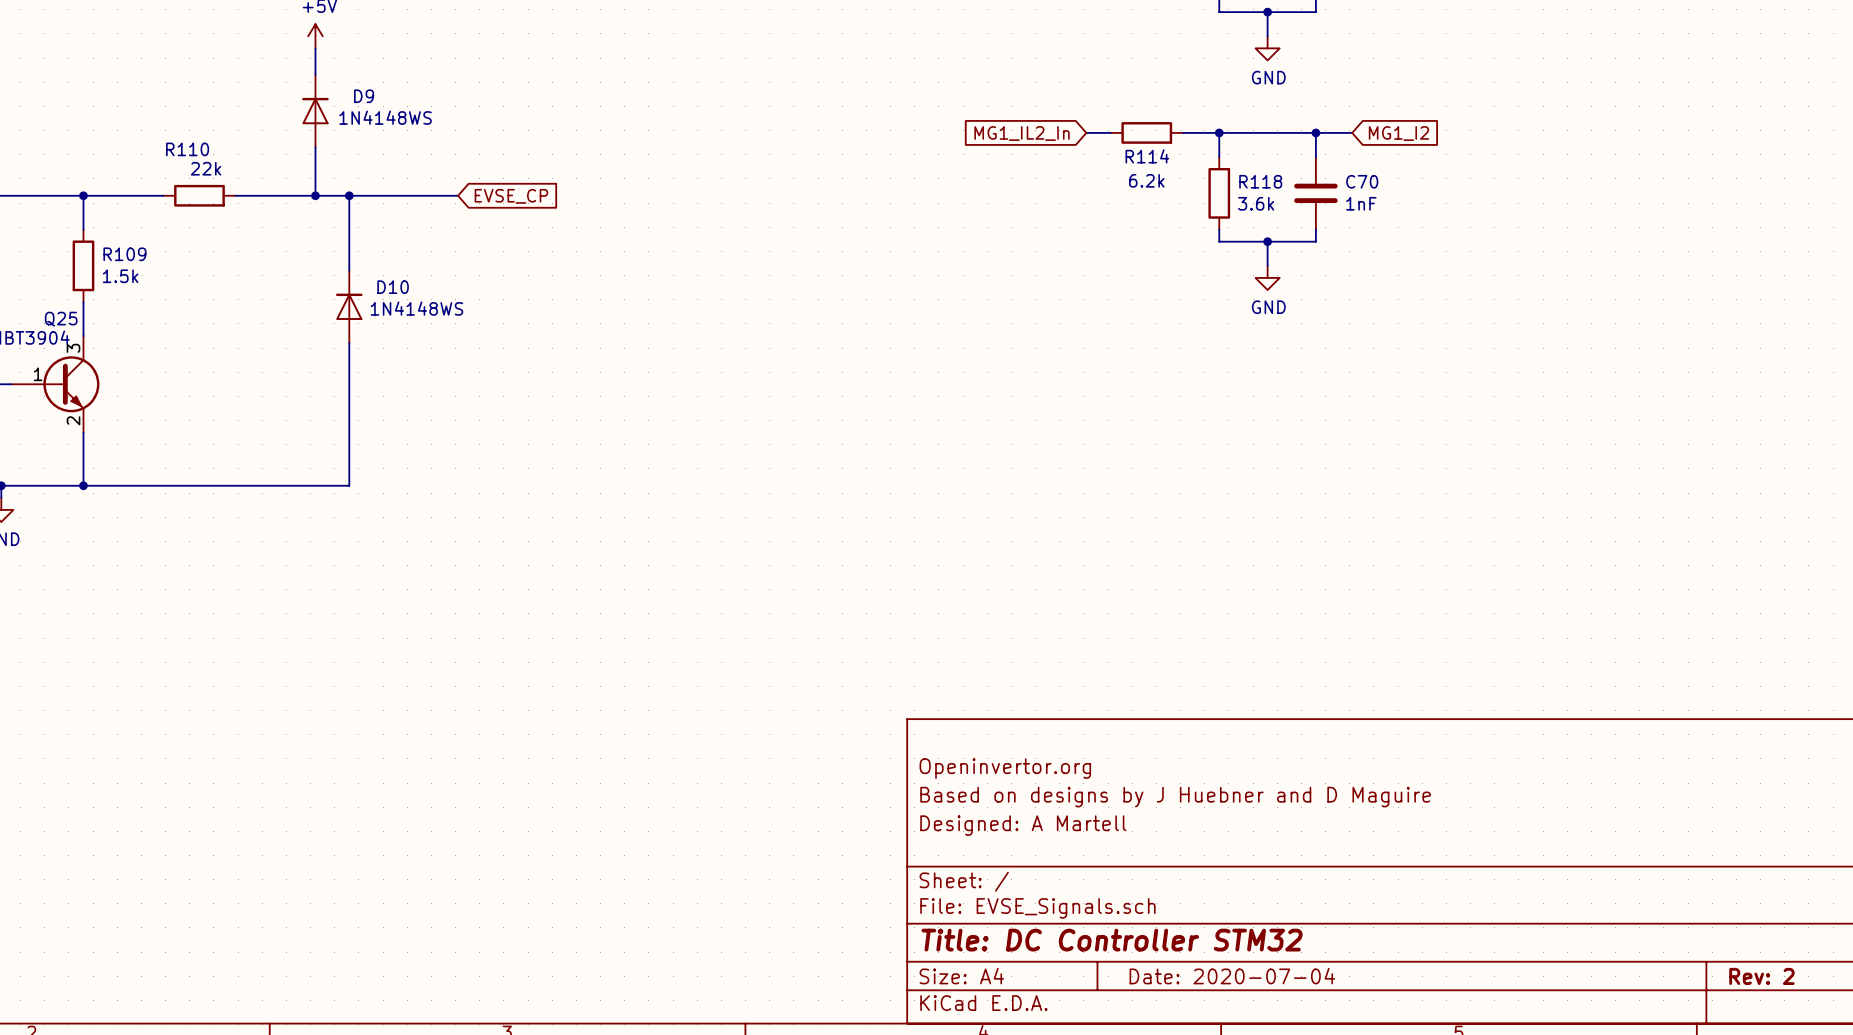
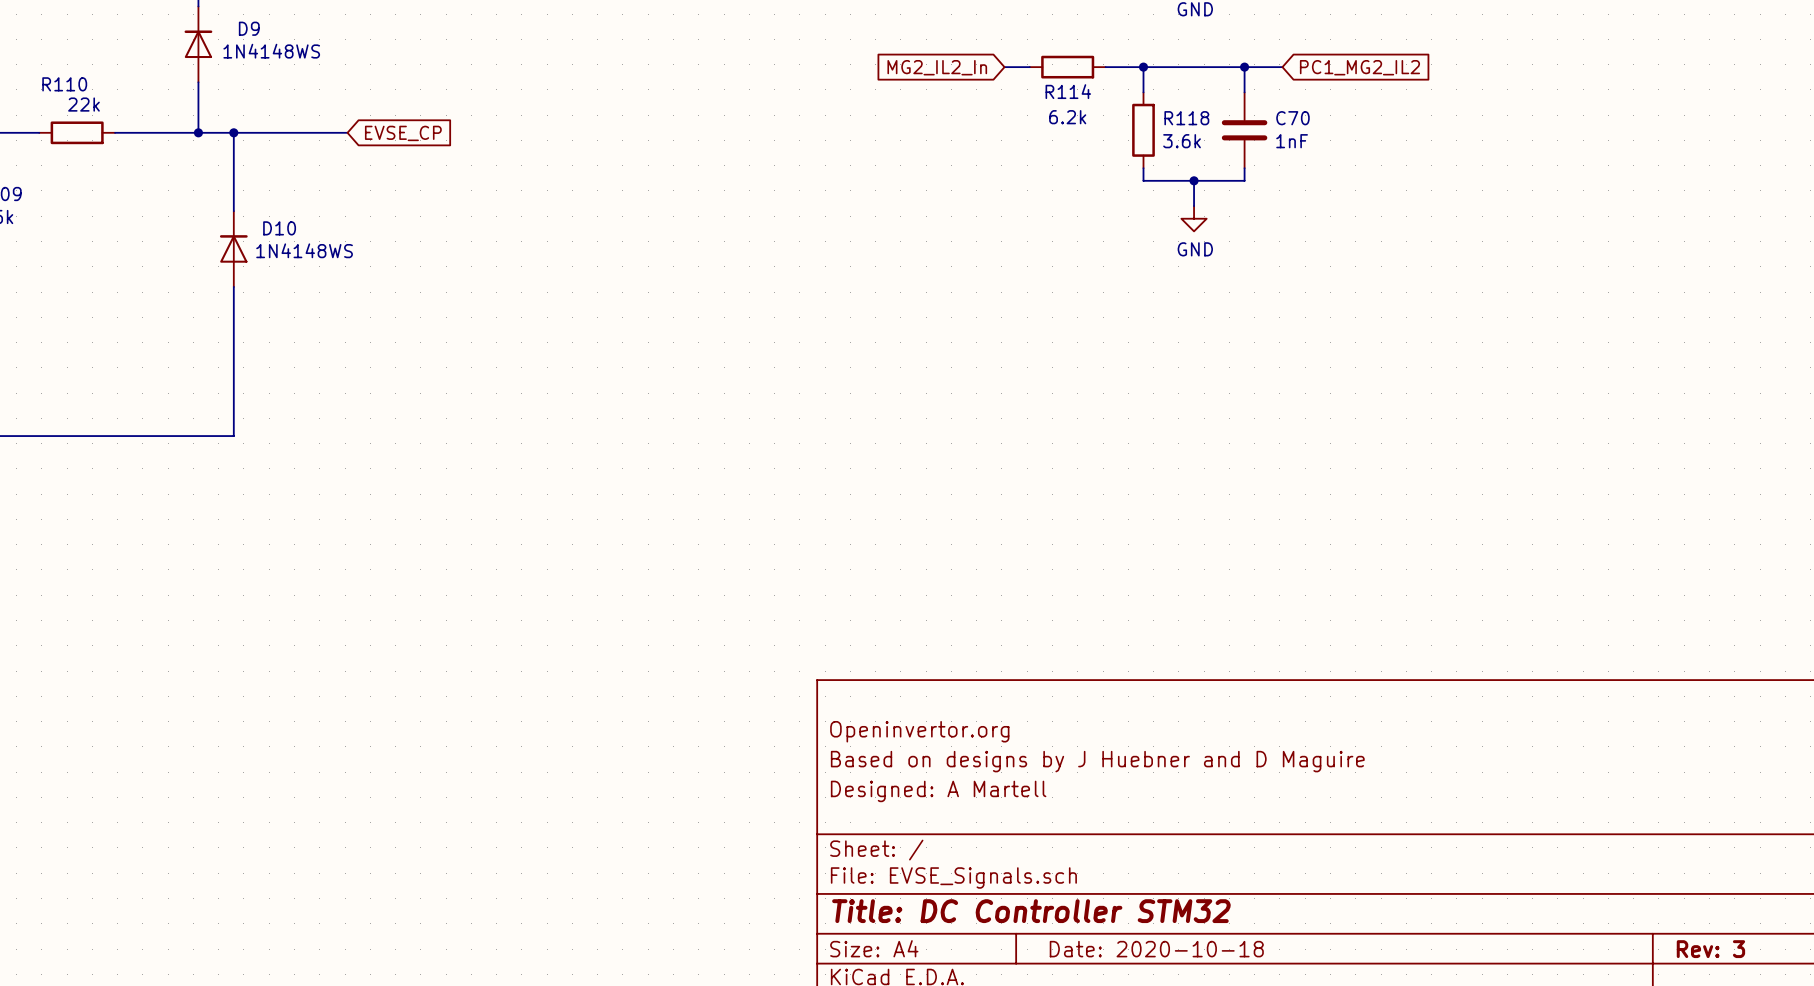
global label: MG1_IL2_In (1022, 133) -> MG2_IL2_In (937, 67)
global label: MG1_I2 (1398, 133) -> PC1_MG2_IL2 (1359, 67)
title block: Date: 2020-07-04 (1232, 976) -> Date: 2020-10-18 (1156, 949)
title block: Rev: 2 (1761, 976) -> Rev: 3 (1710, 949)

